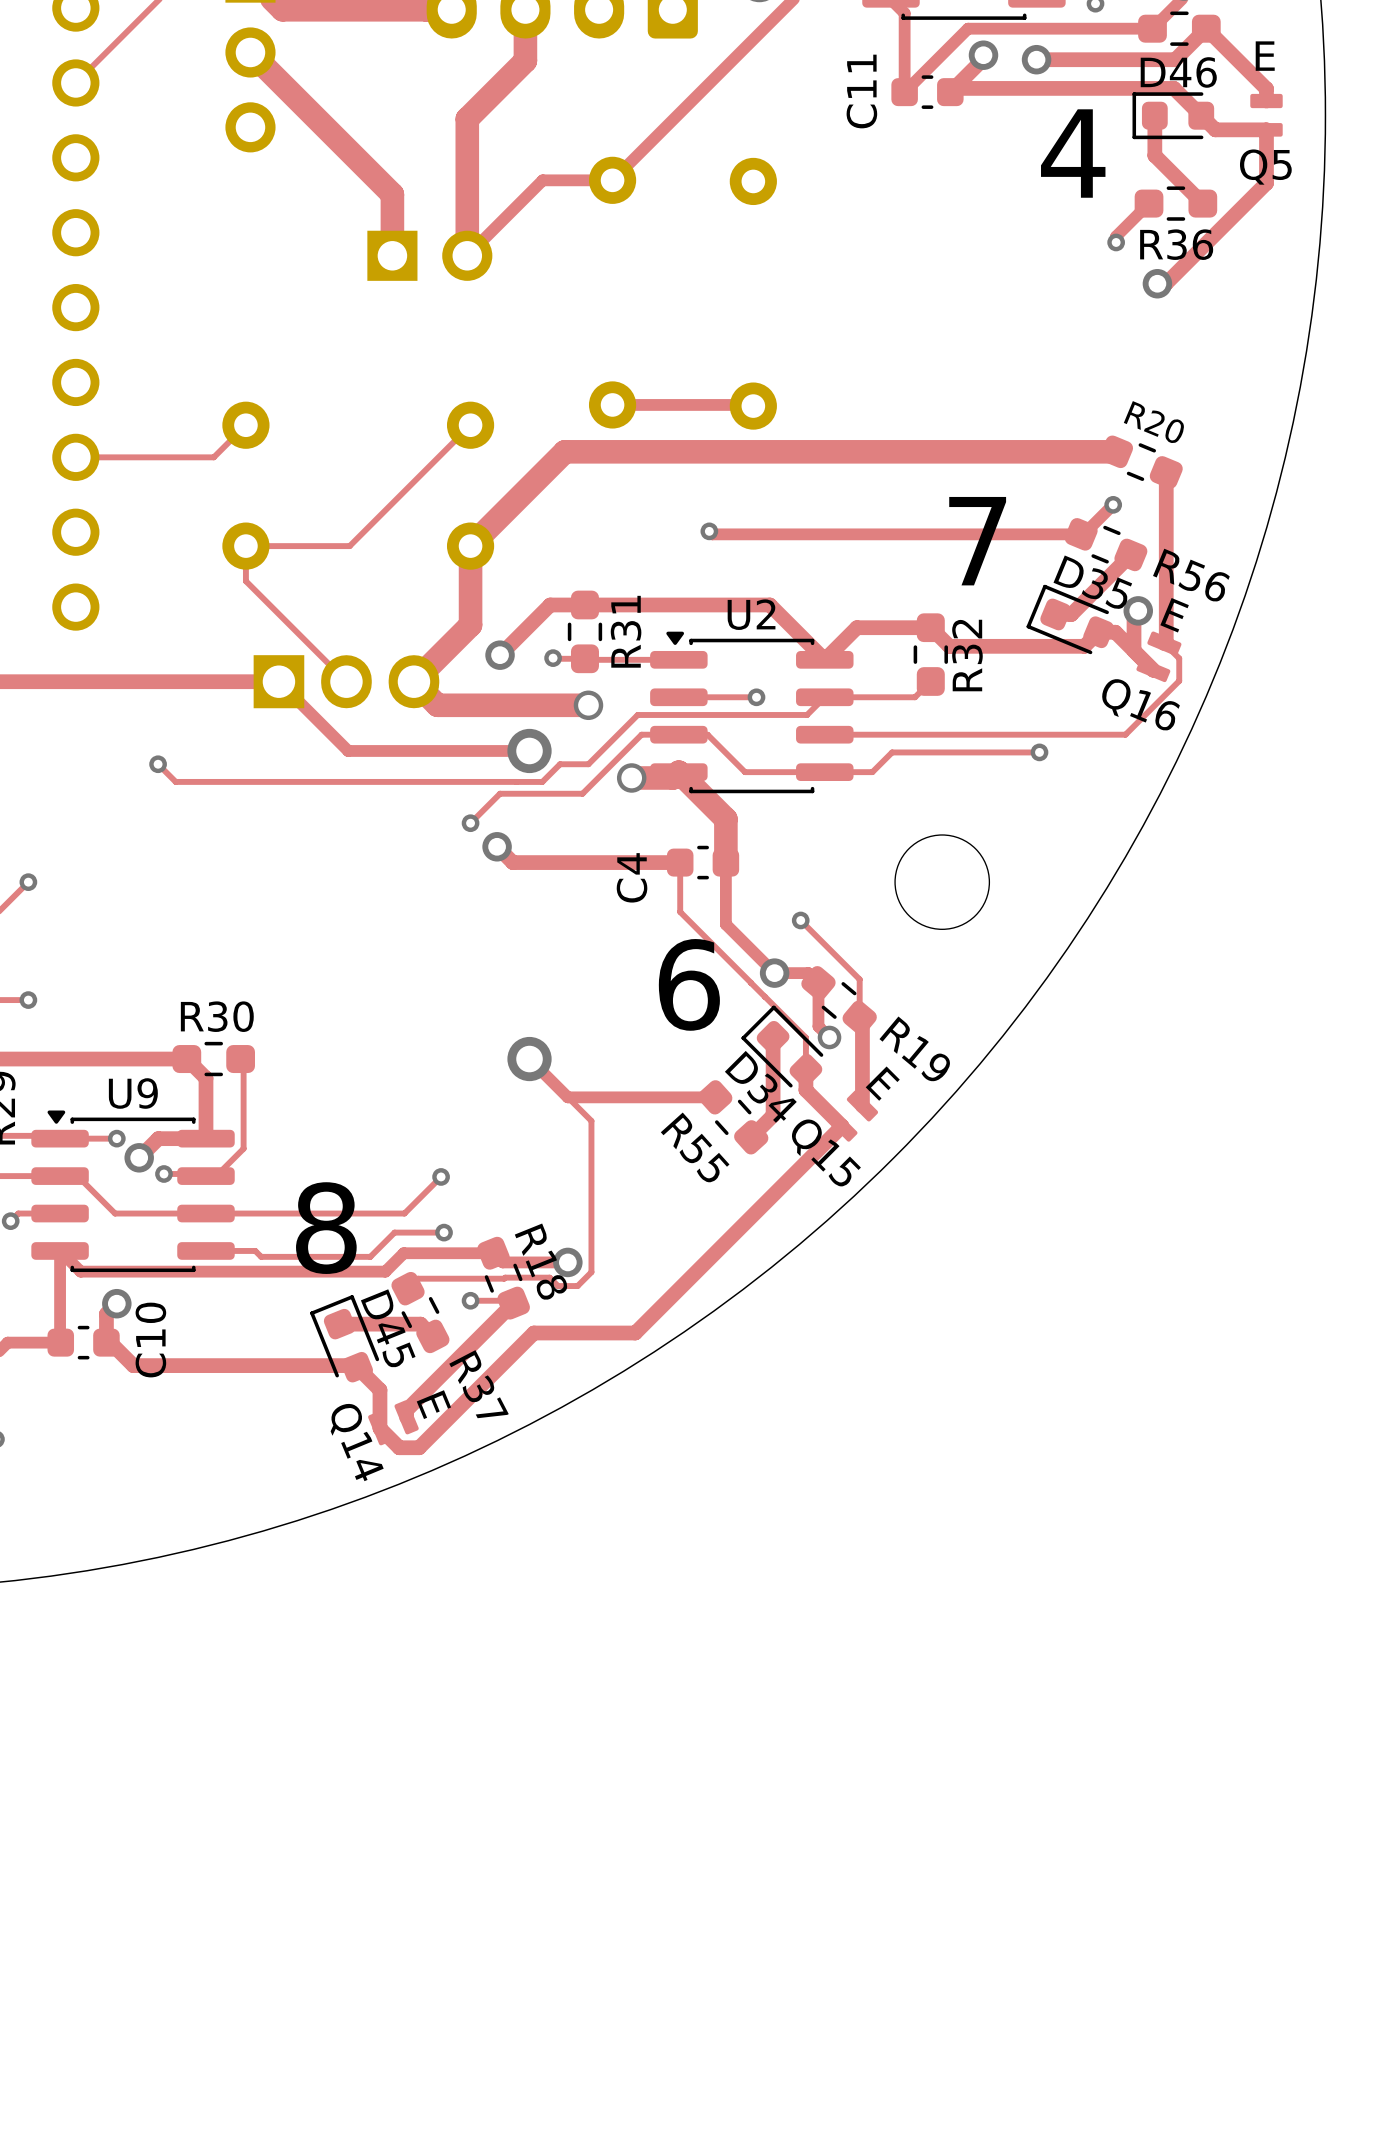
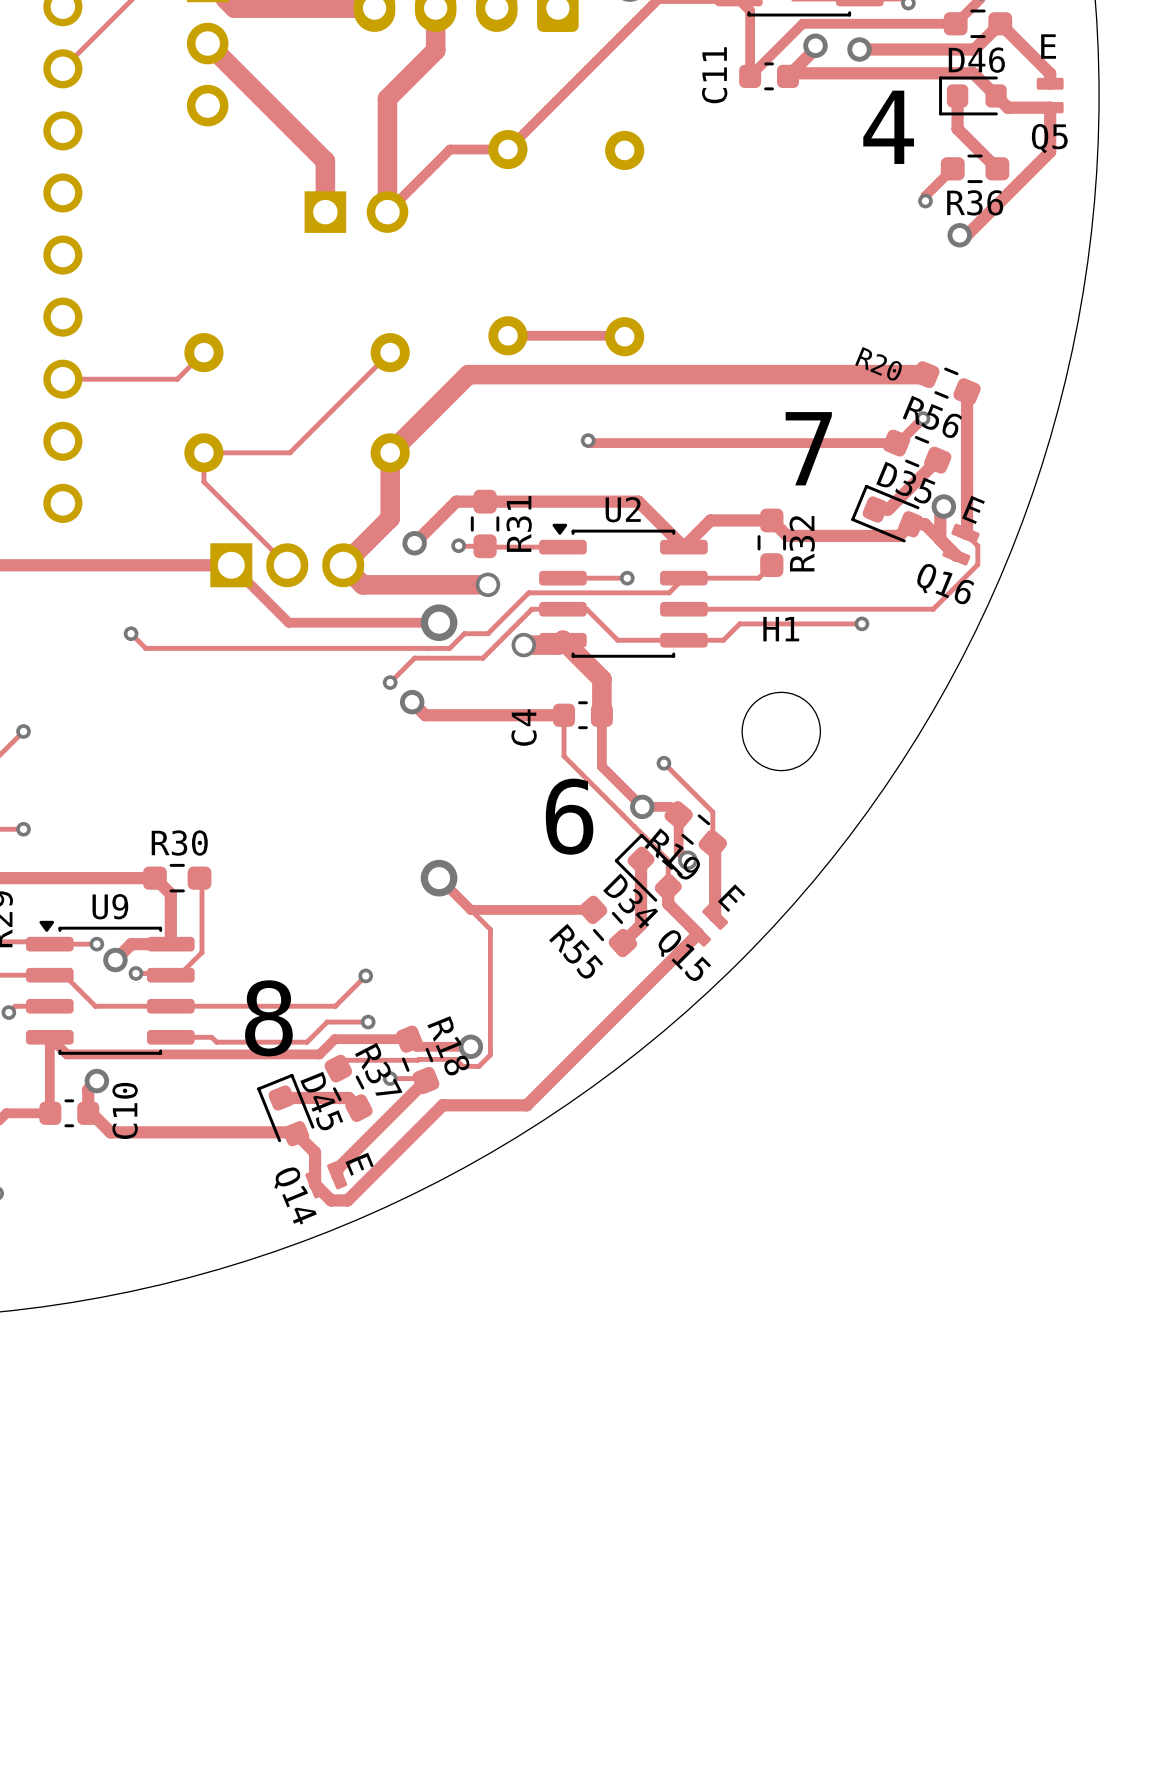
R20 name position: R20 (1154, 422) -> R20 (878, 364)
R56 name position: R56 (1191, 575) -> R56 (932, 417)
H1 name: none -> H1 (781, 629)
R19 name position: R19 (914, 1049) -> R19 (672, 854)
R37 name position: R37 (479, 1384) -> R37 (378, 1069)

